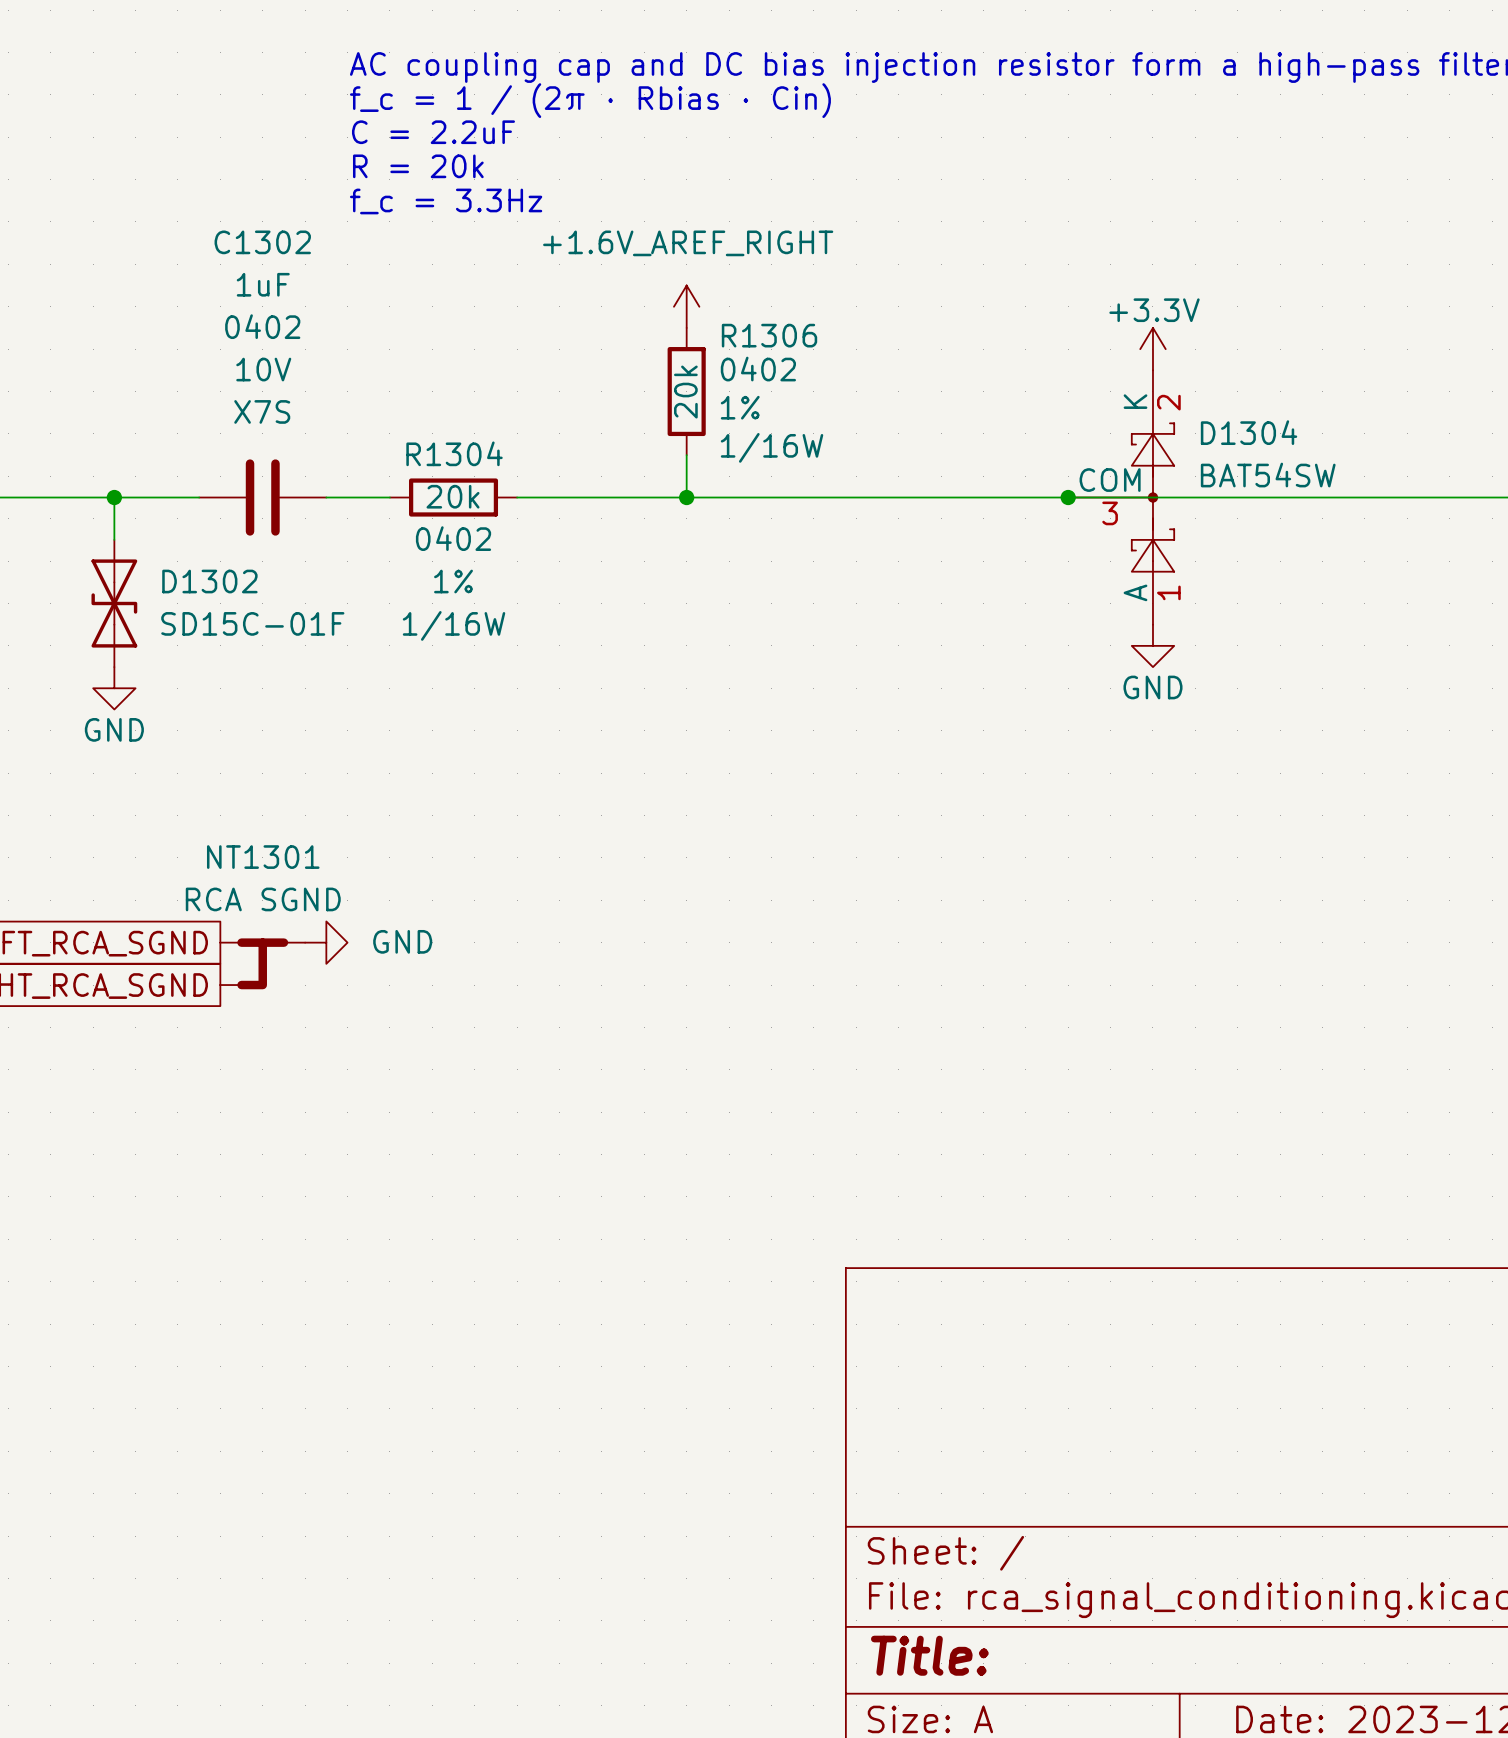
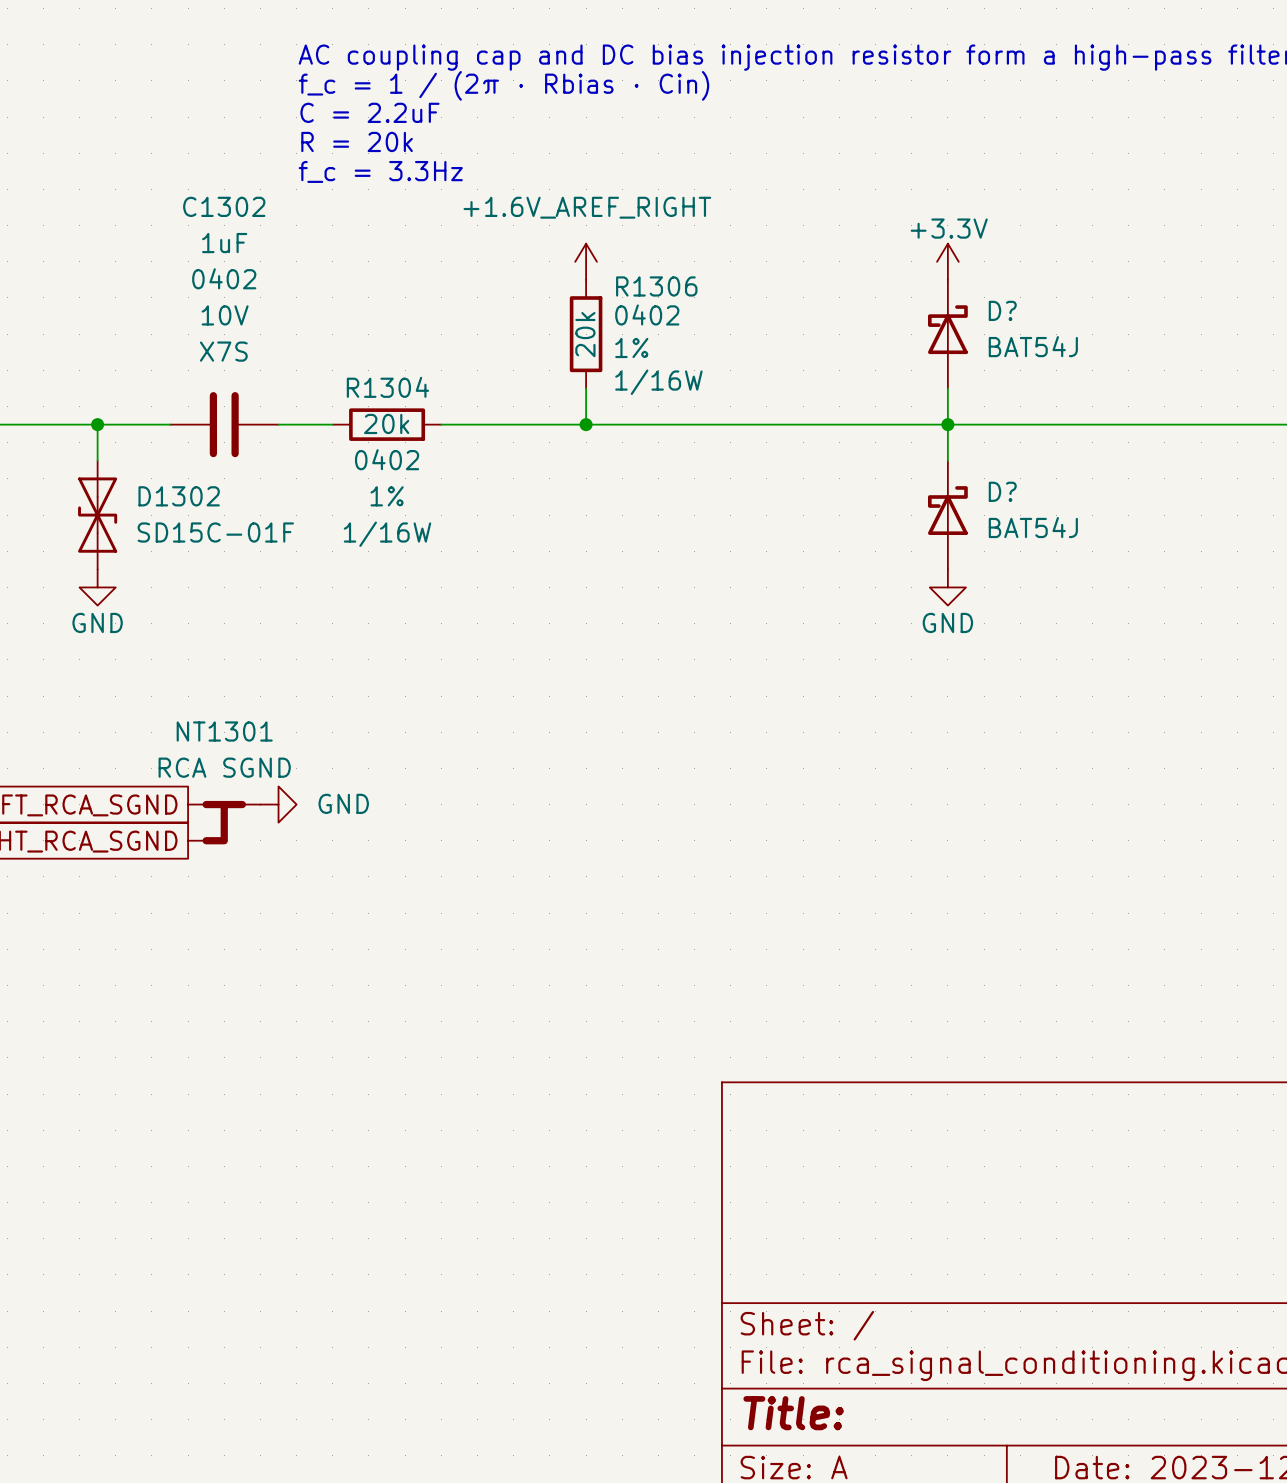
power symbol position: +3.3V (1152, 349) -> +3.3V (947, 261)
D?: none -> BAT54J (947, 334)
wire: none -> (947, 388) (947, 460)
junction position: (1068, 497) -> (947, 424)
D1304: BAT54SW (1121, 497) -> none
D?: none -> BAT54J (947, 515)
power symbol position: GND (1152, 645) -> GND (947, 587)

